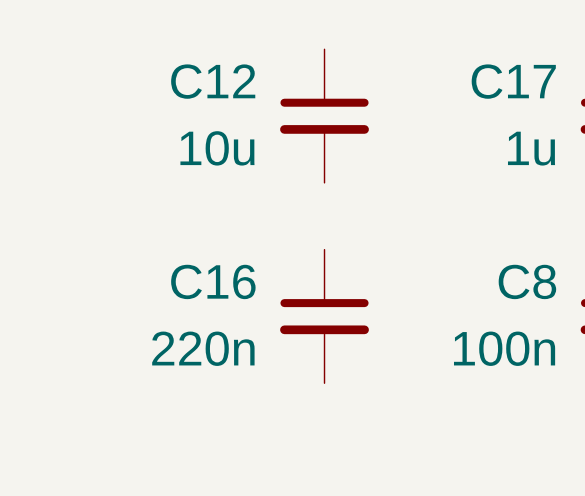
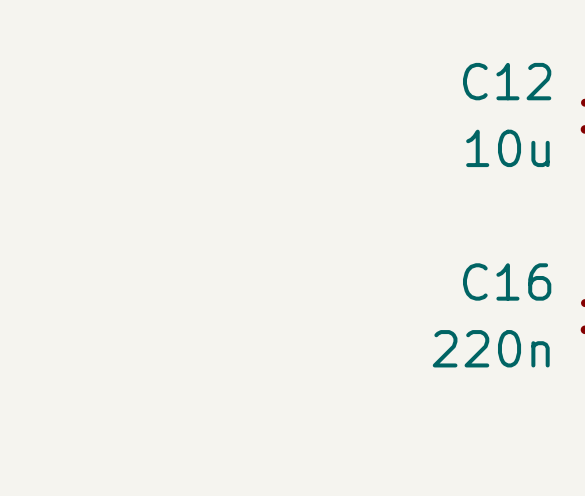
C17 name: C17 (513, 81) -> C12 (507, 81)
C12: 10u (324, 116) -> none
C17 value: 1u (531, 148) -> 10u (507, 148)
C8 name: C8 (527, 281) -> C16 (507, 281)
C16: 220n (324, 316) -> none
C8 value: 100n (504, 348) -> 220n (491, 348)

